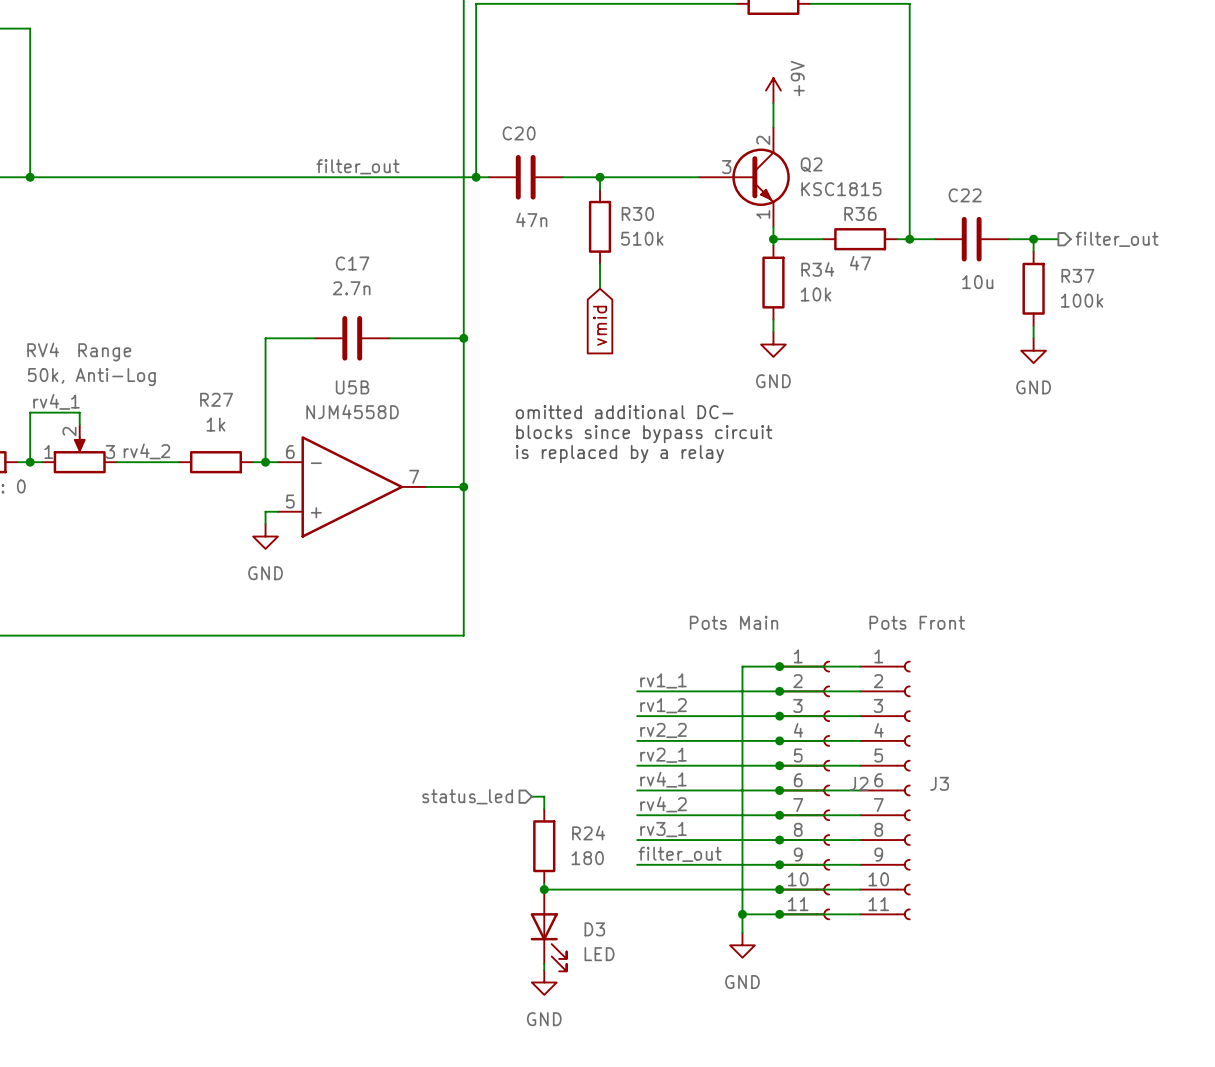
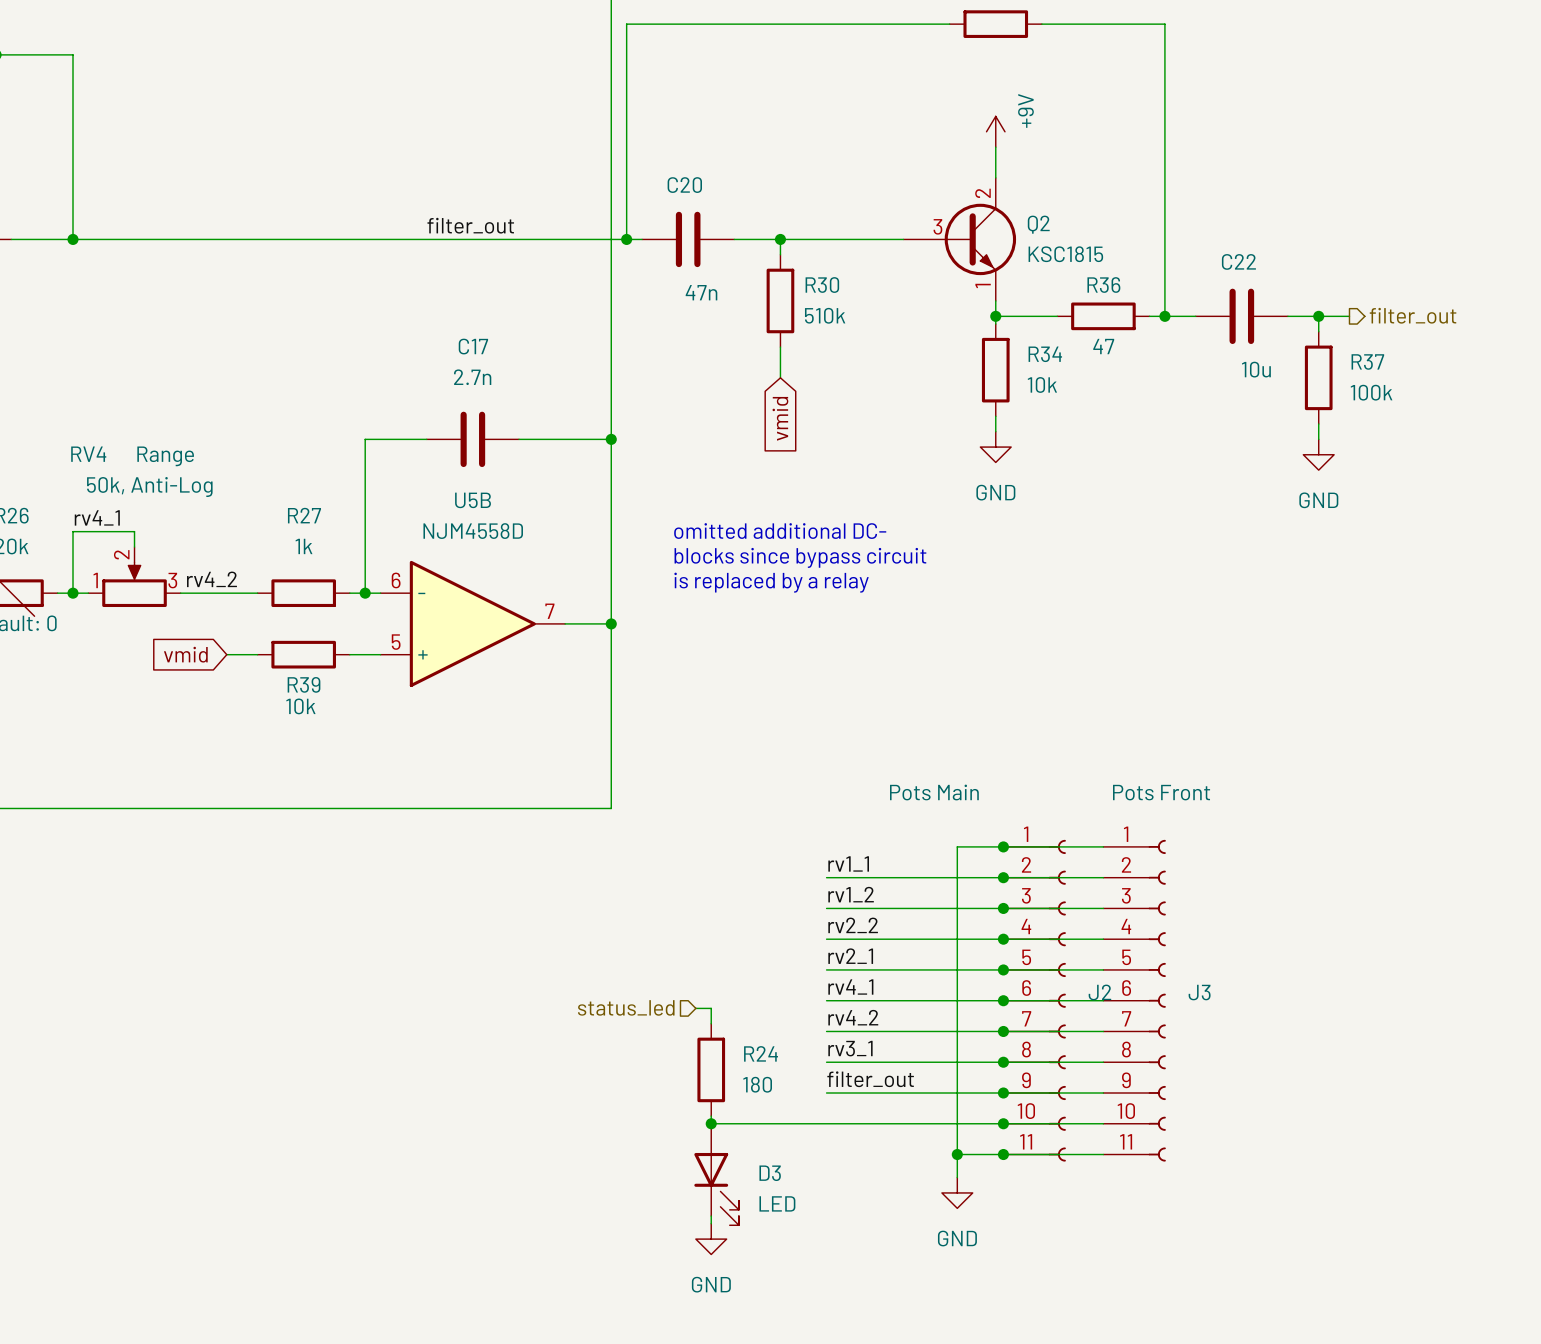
global label: none -> vmid (185, 654)
wire: none -> (226, 654) (257, 654)
R39: none -> 10k (303, 654)
wire: (265, 511) (265, 524) -> (365, 654) (349, 654)
power symbol: GND (265, 536) -> none

